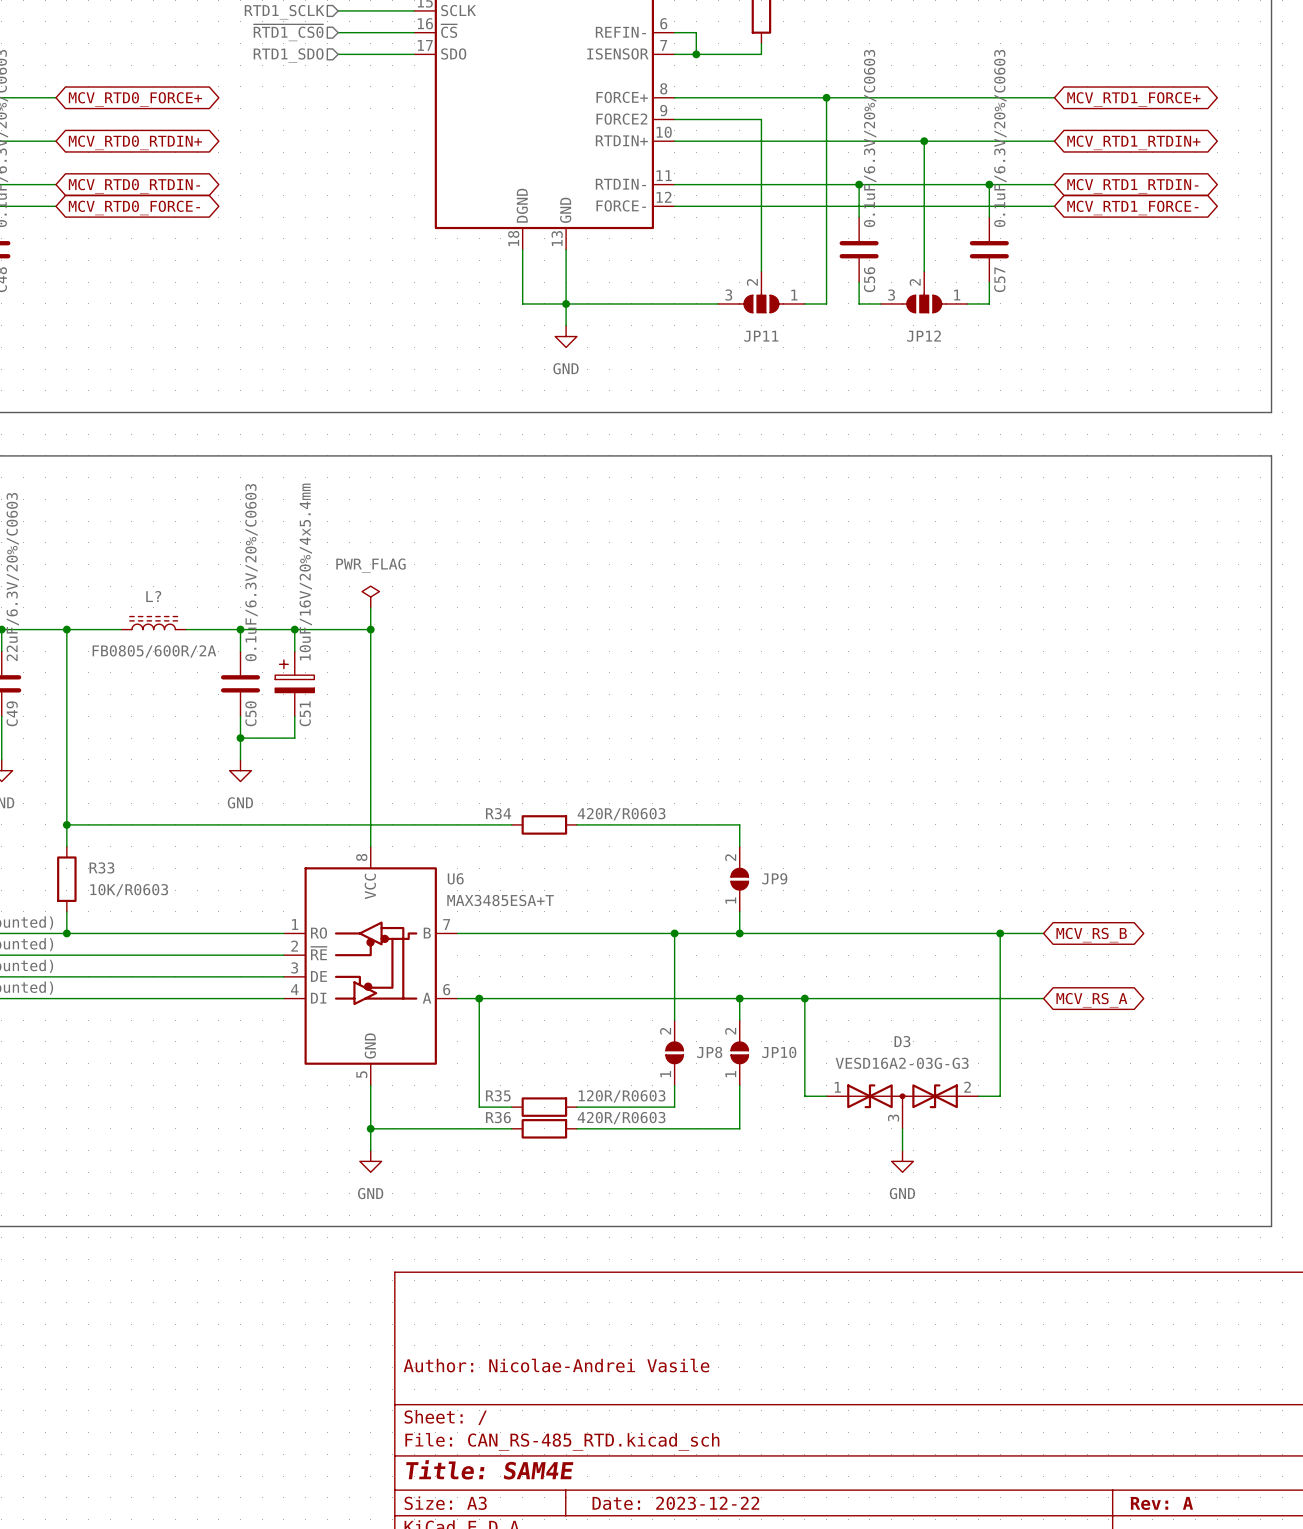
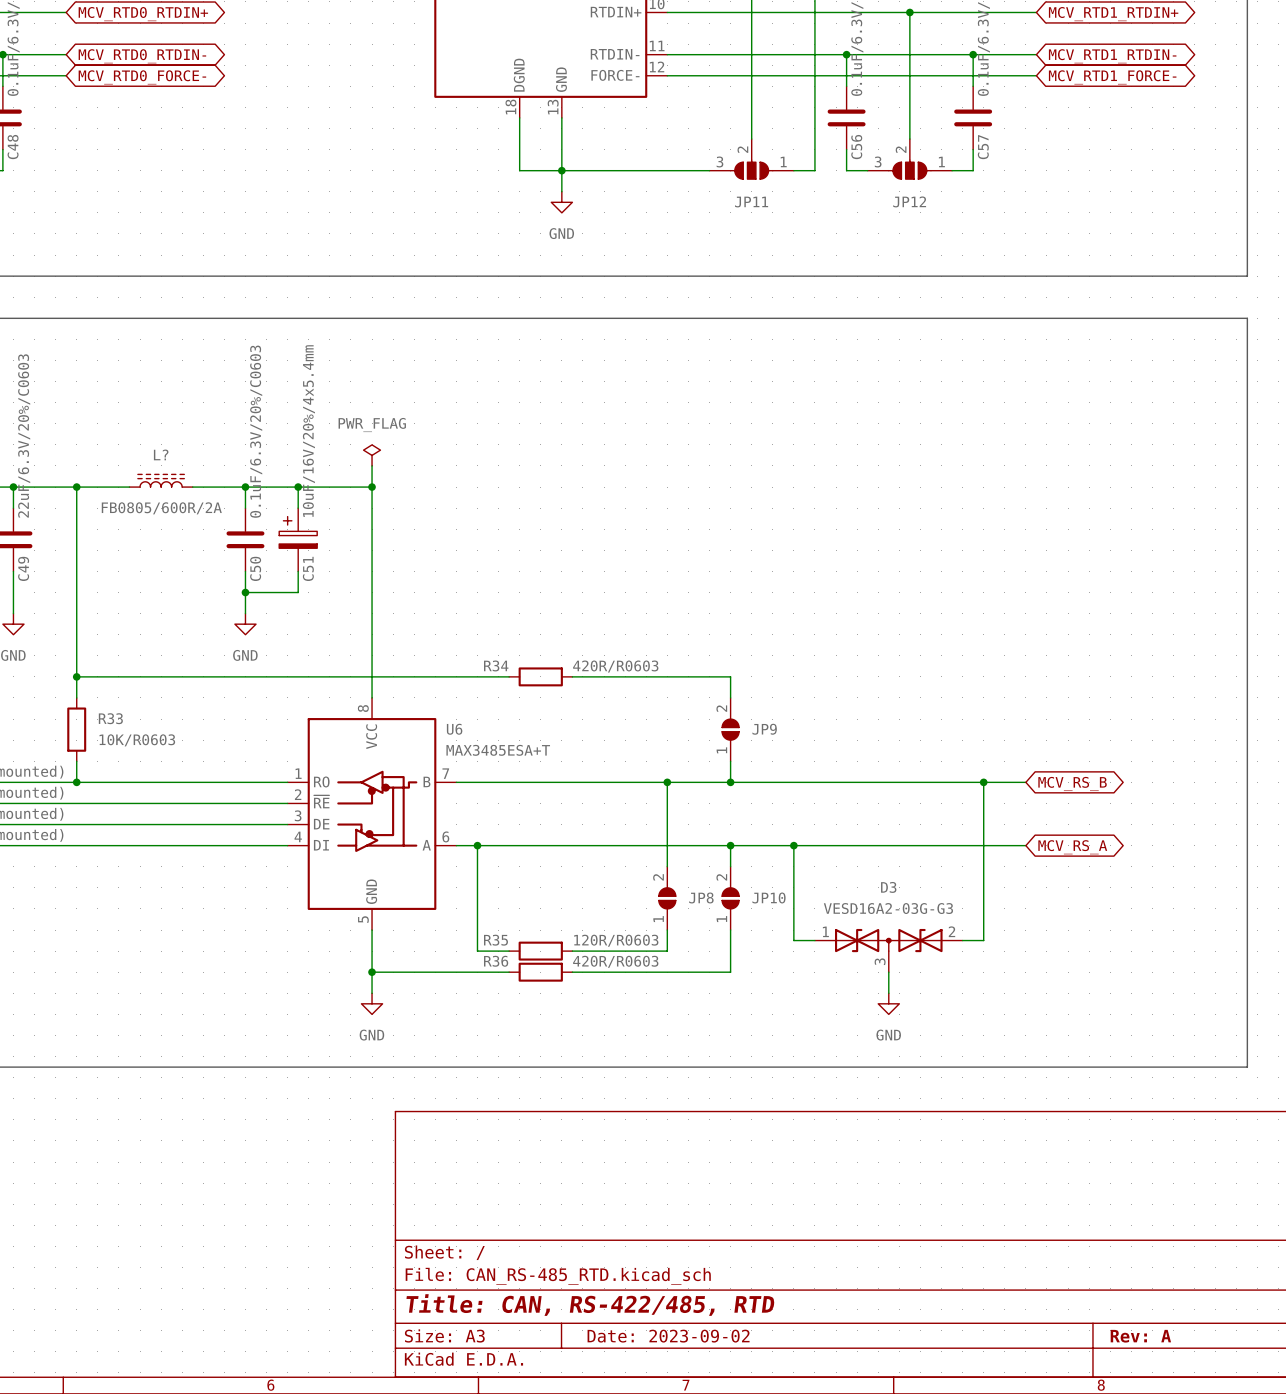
title block: Author: Nicolae-Andrei Vasile (556, 1365) -> none
title block: Title: SAM4E (489, 1469) -> Title: CAN, RS-422/485, RTD (590, 1305)
title block: Date: 2023-12-22 (675, 1503) -> Date: 2023-09-02 (668, 1336)

